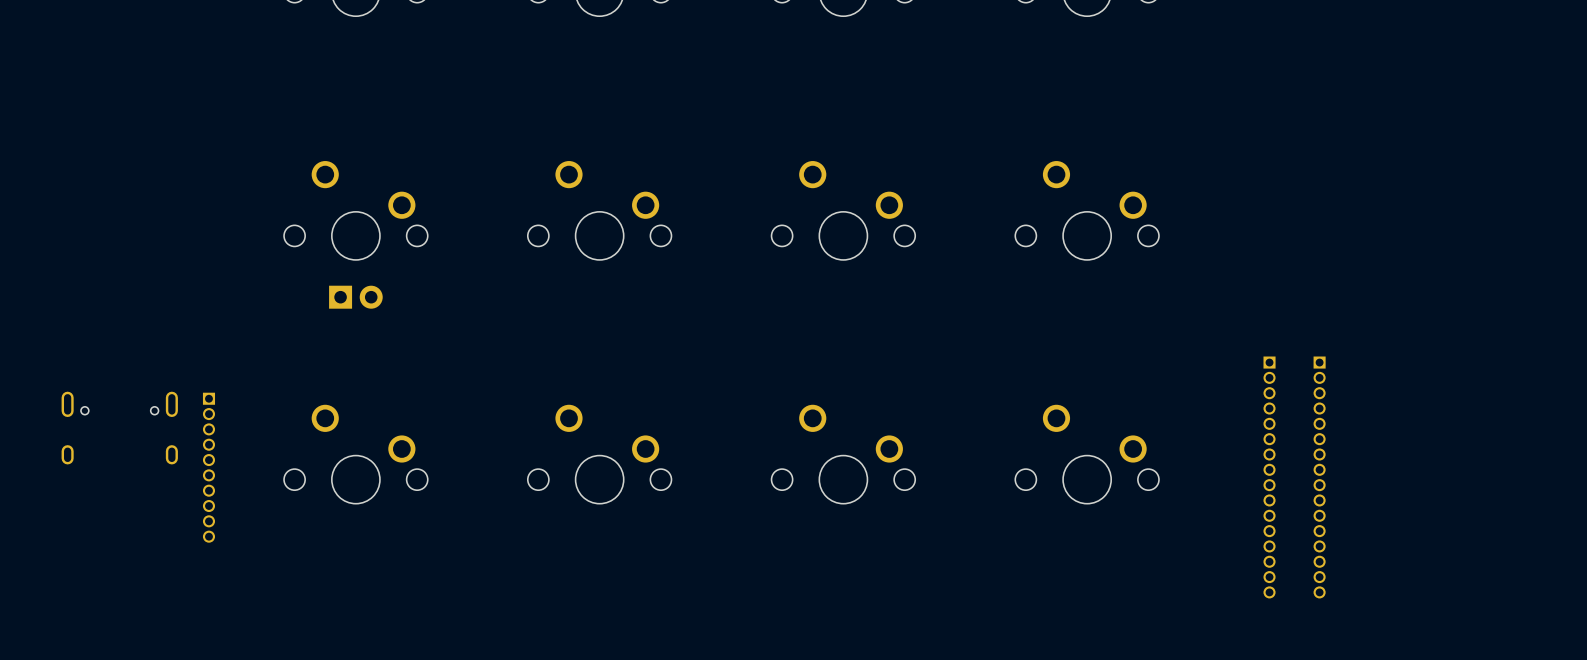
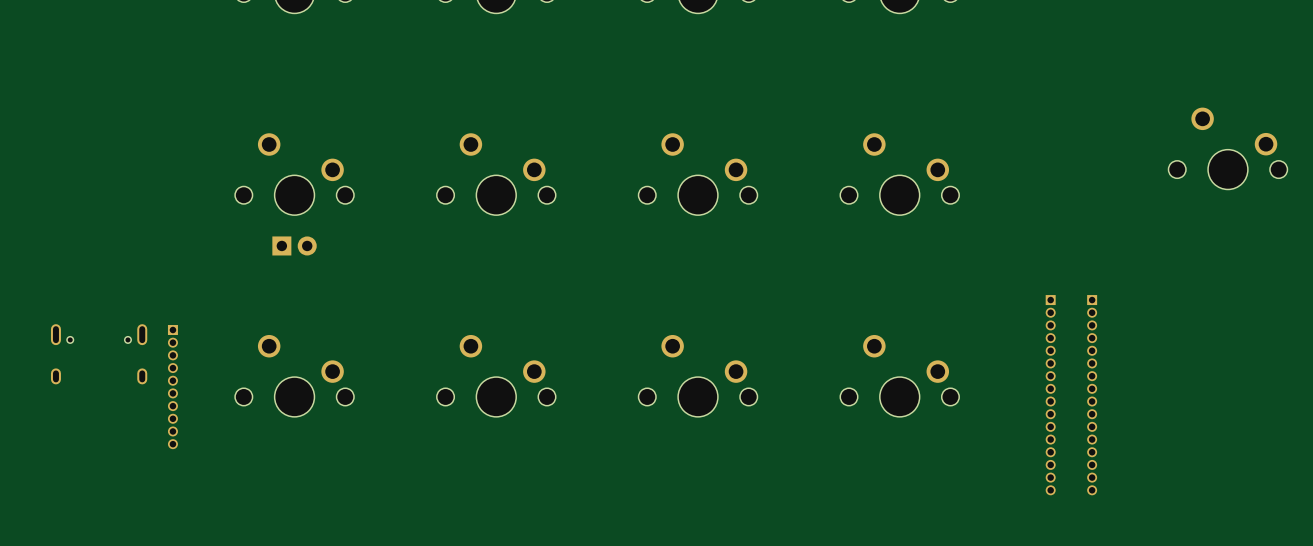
part: none -> (1227, 148)

